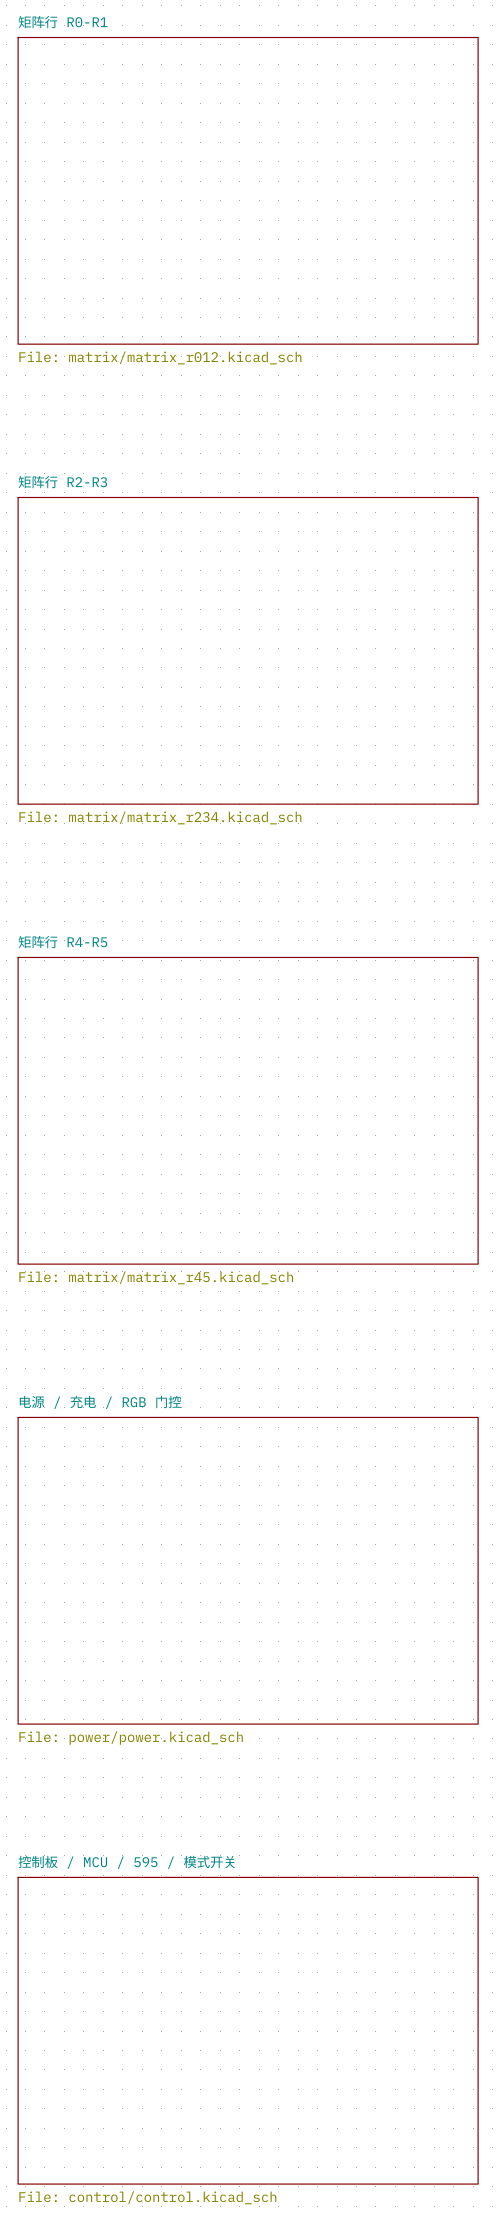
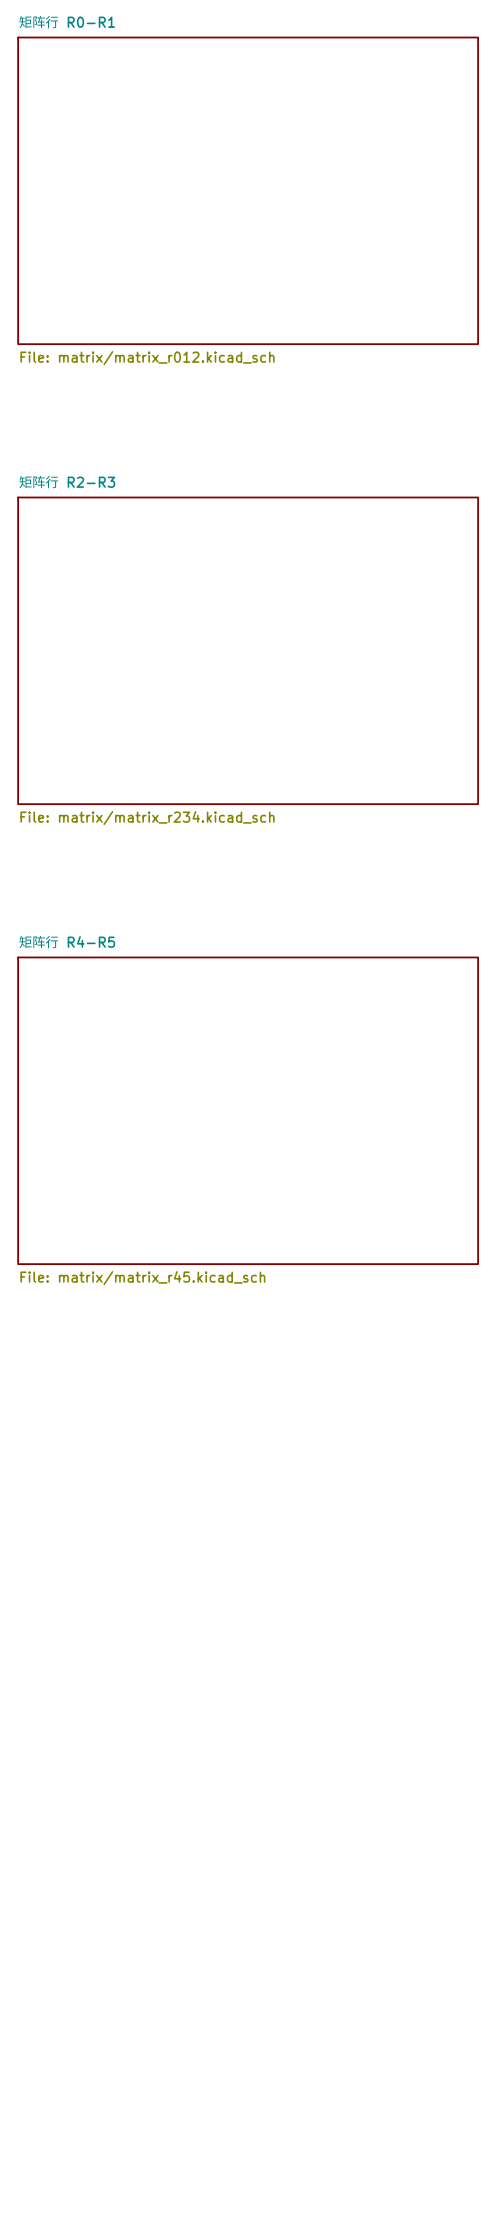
sheet 电源 / 充电 / RGB 门控: File: power/power.kicad_sch (248, 1570) -> none
sheet 控制板 / MCU / 595 / 模式开关: File: control/control.kicad_sch (248, 2030) -> none

